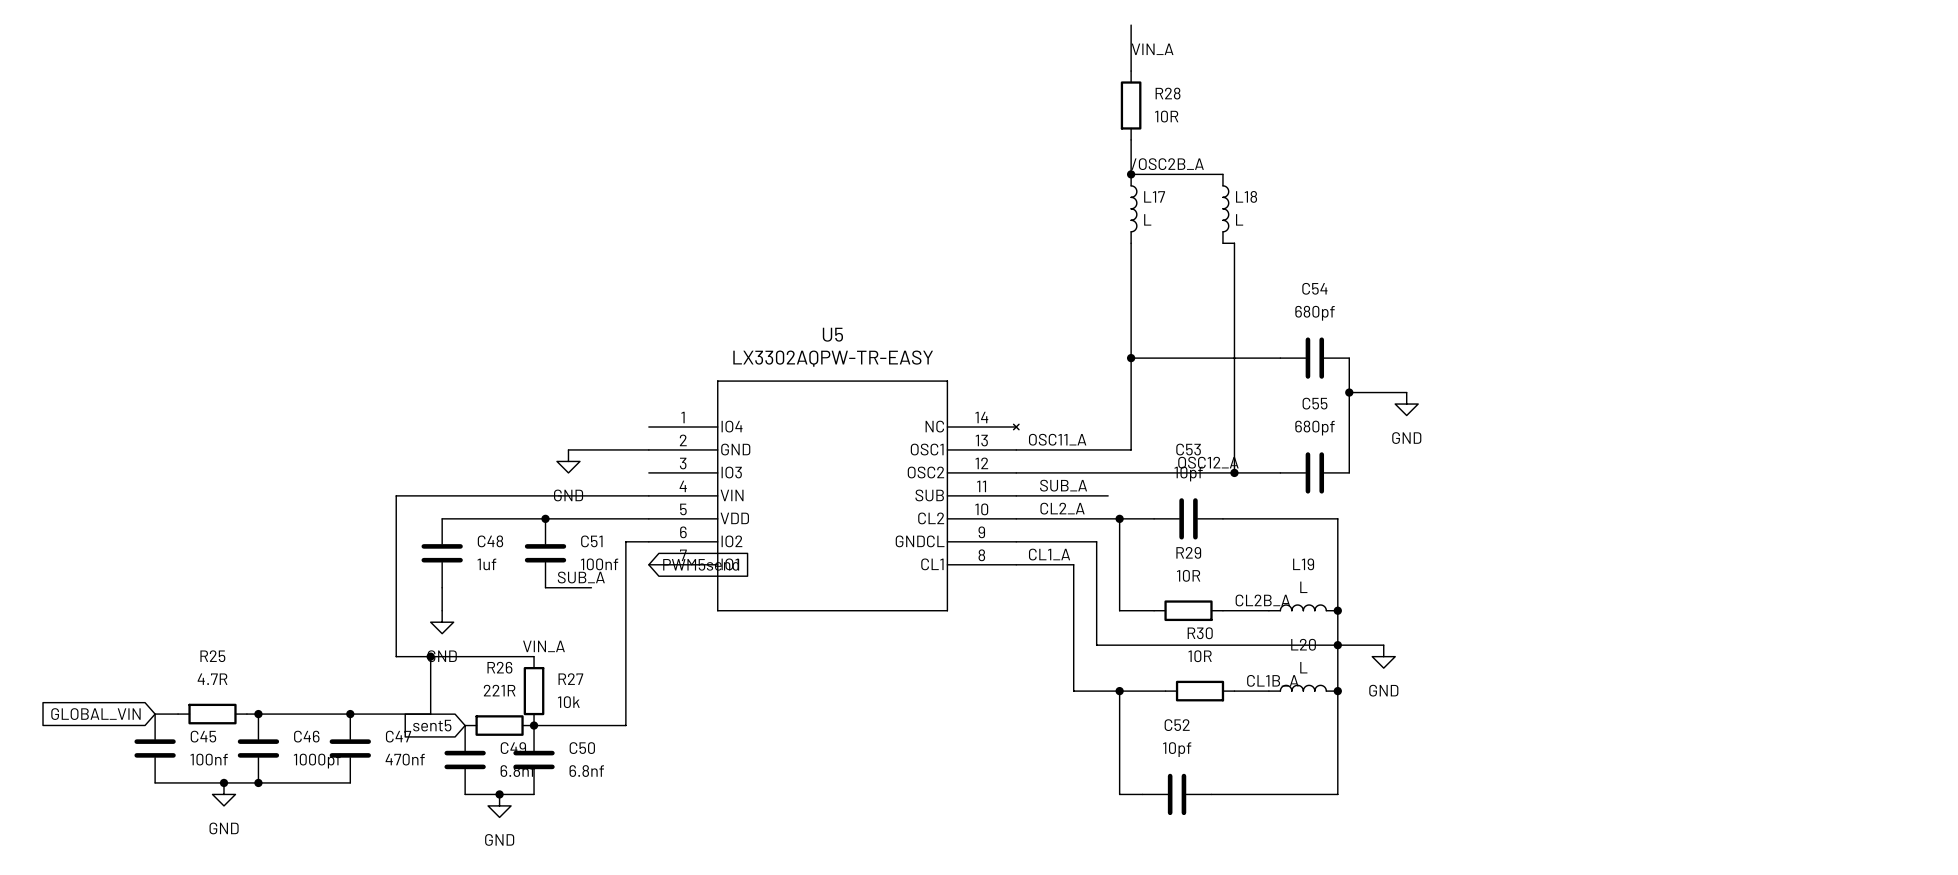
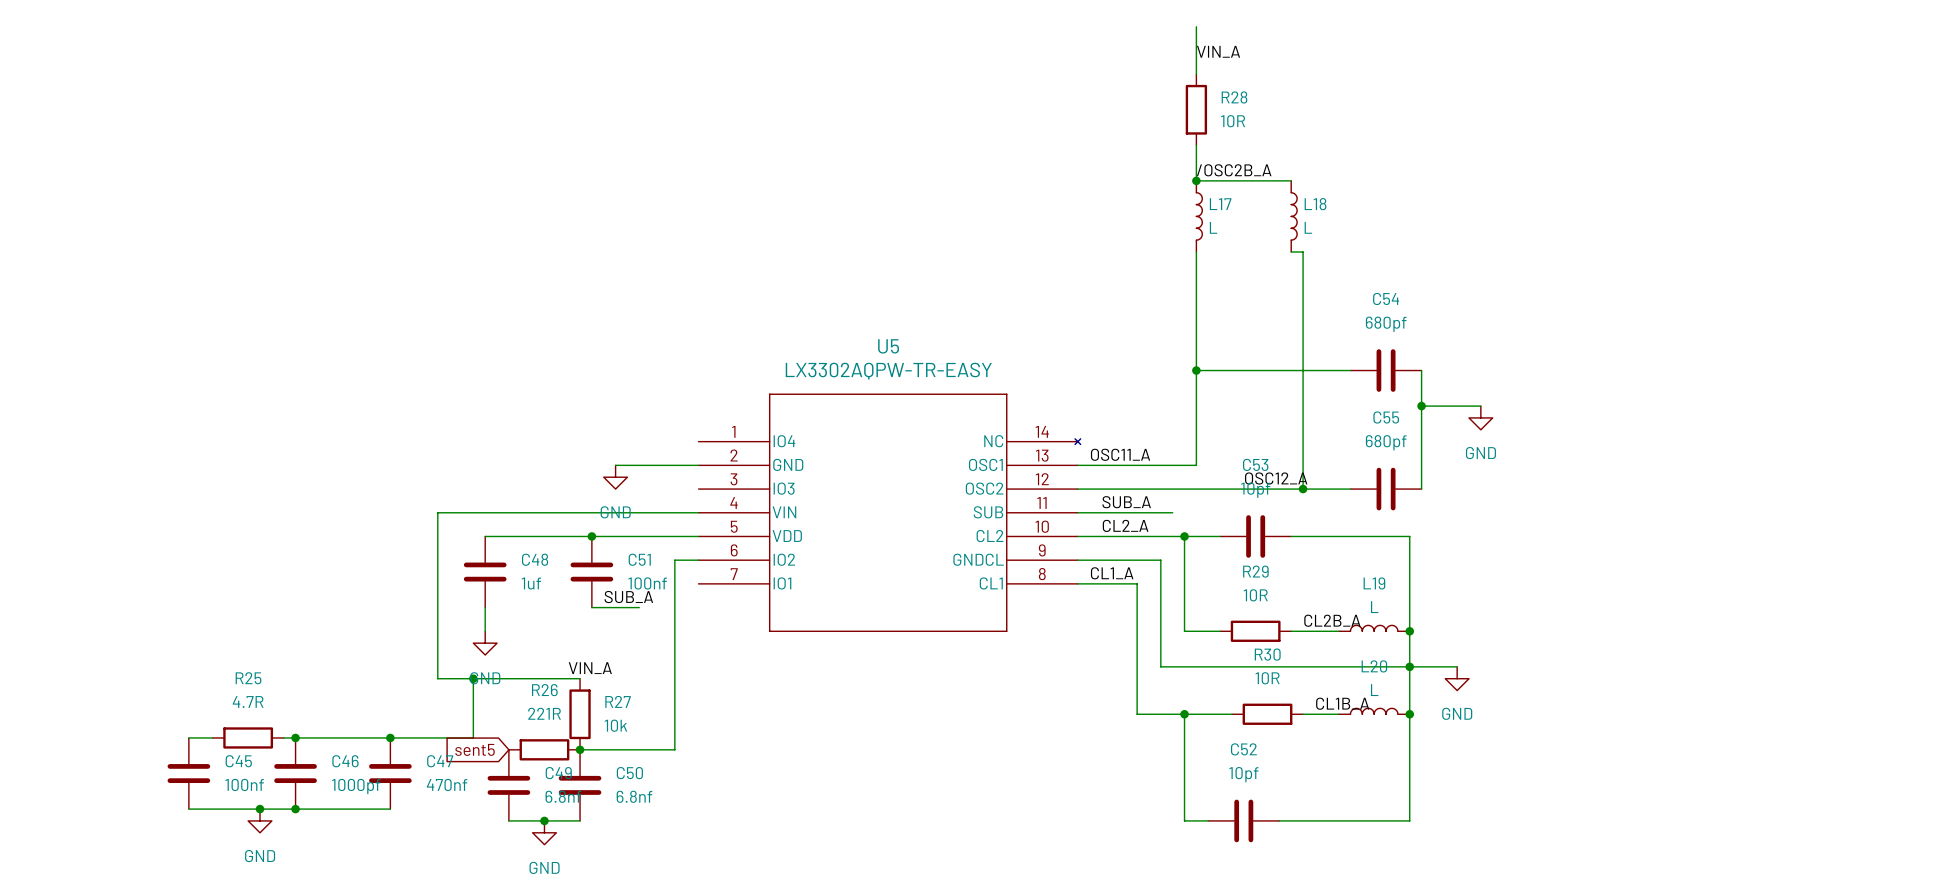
global label: PWM5send (701, 564) -> none
global label: GLOBAL_VIN (95, 714) -> none

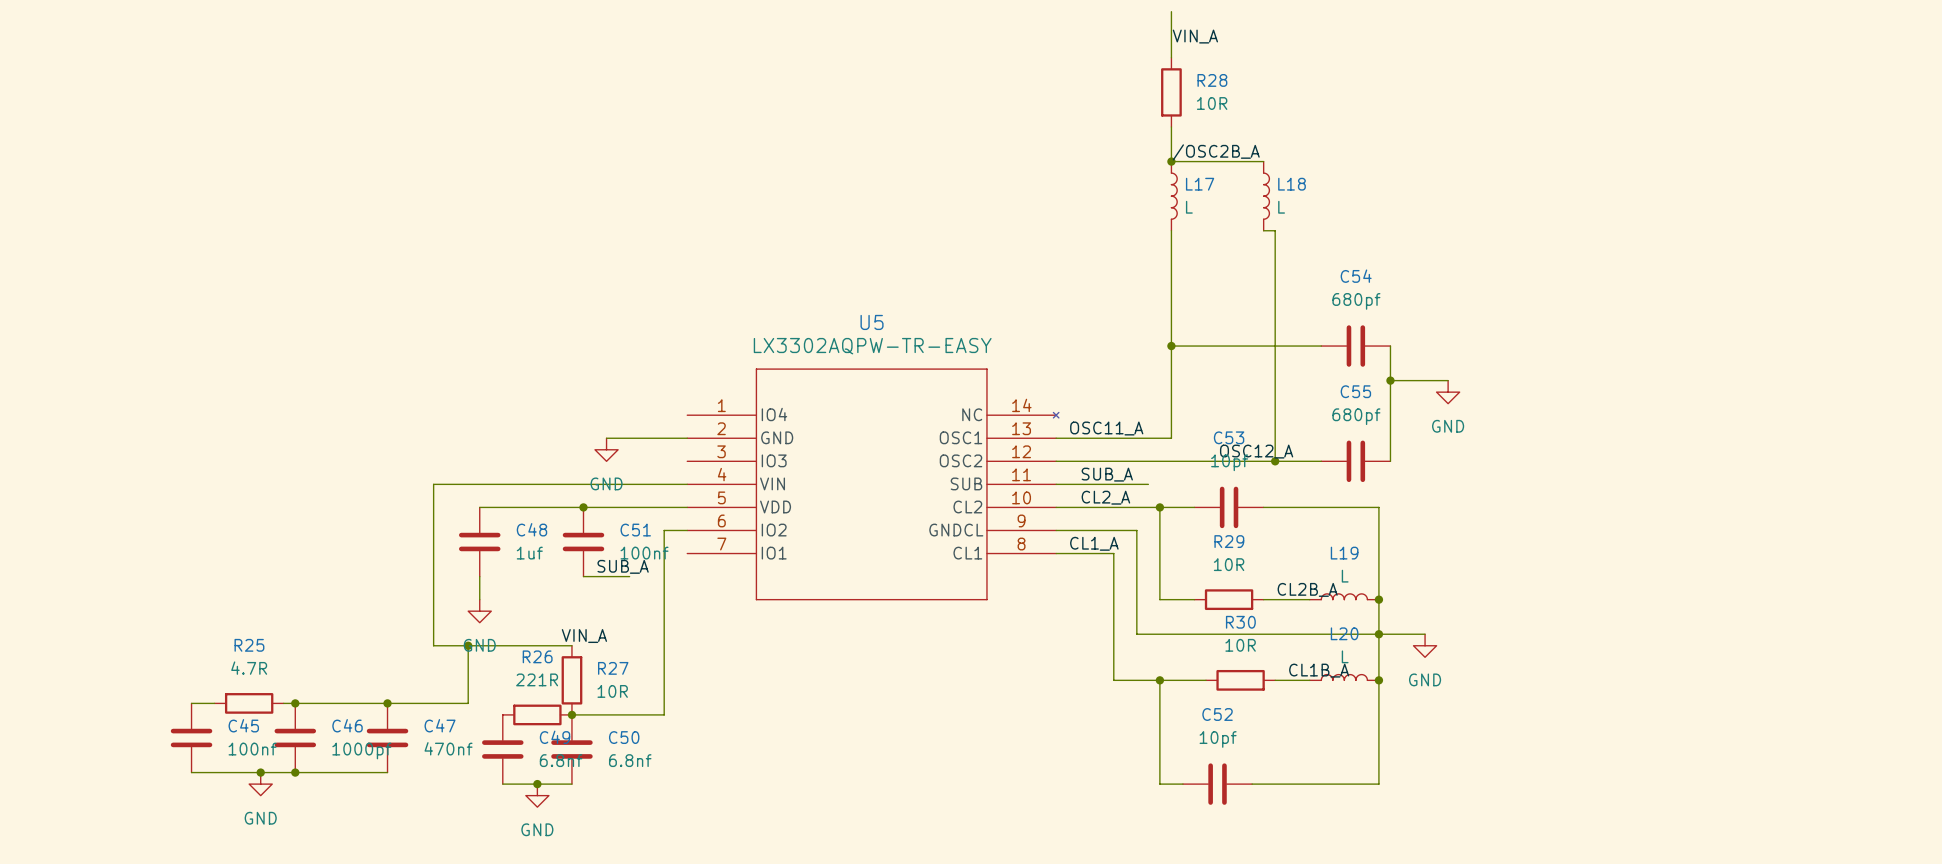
R27 value: 10k (615, 725) -> 10R (612, 691)
global label: sent5 (475, 749) -> none

